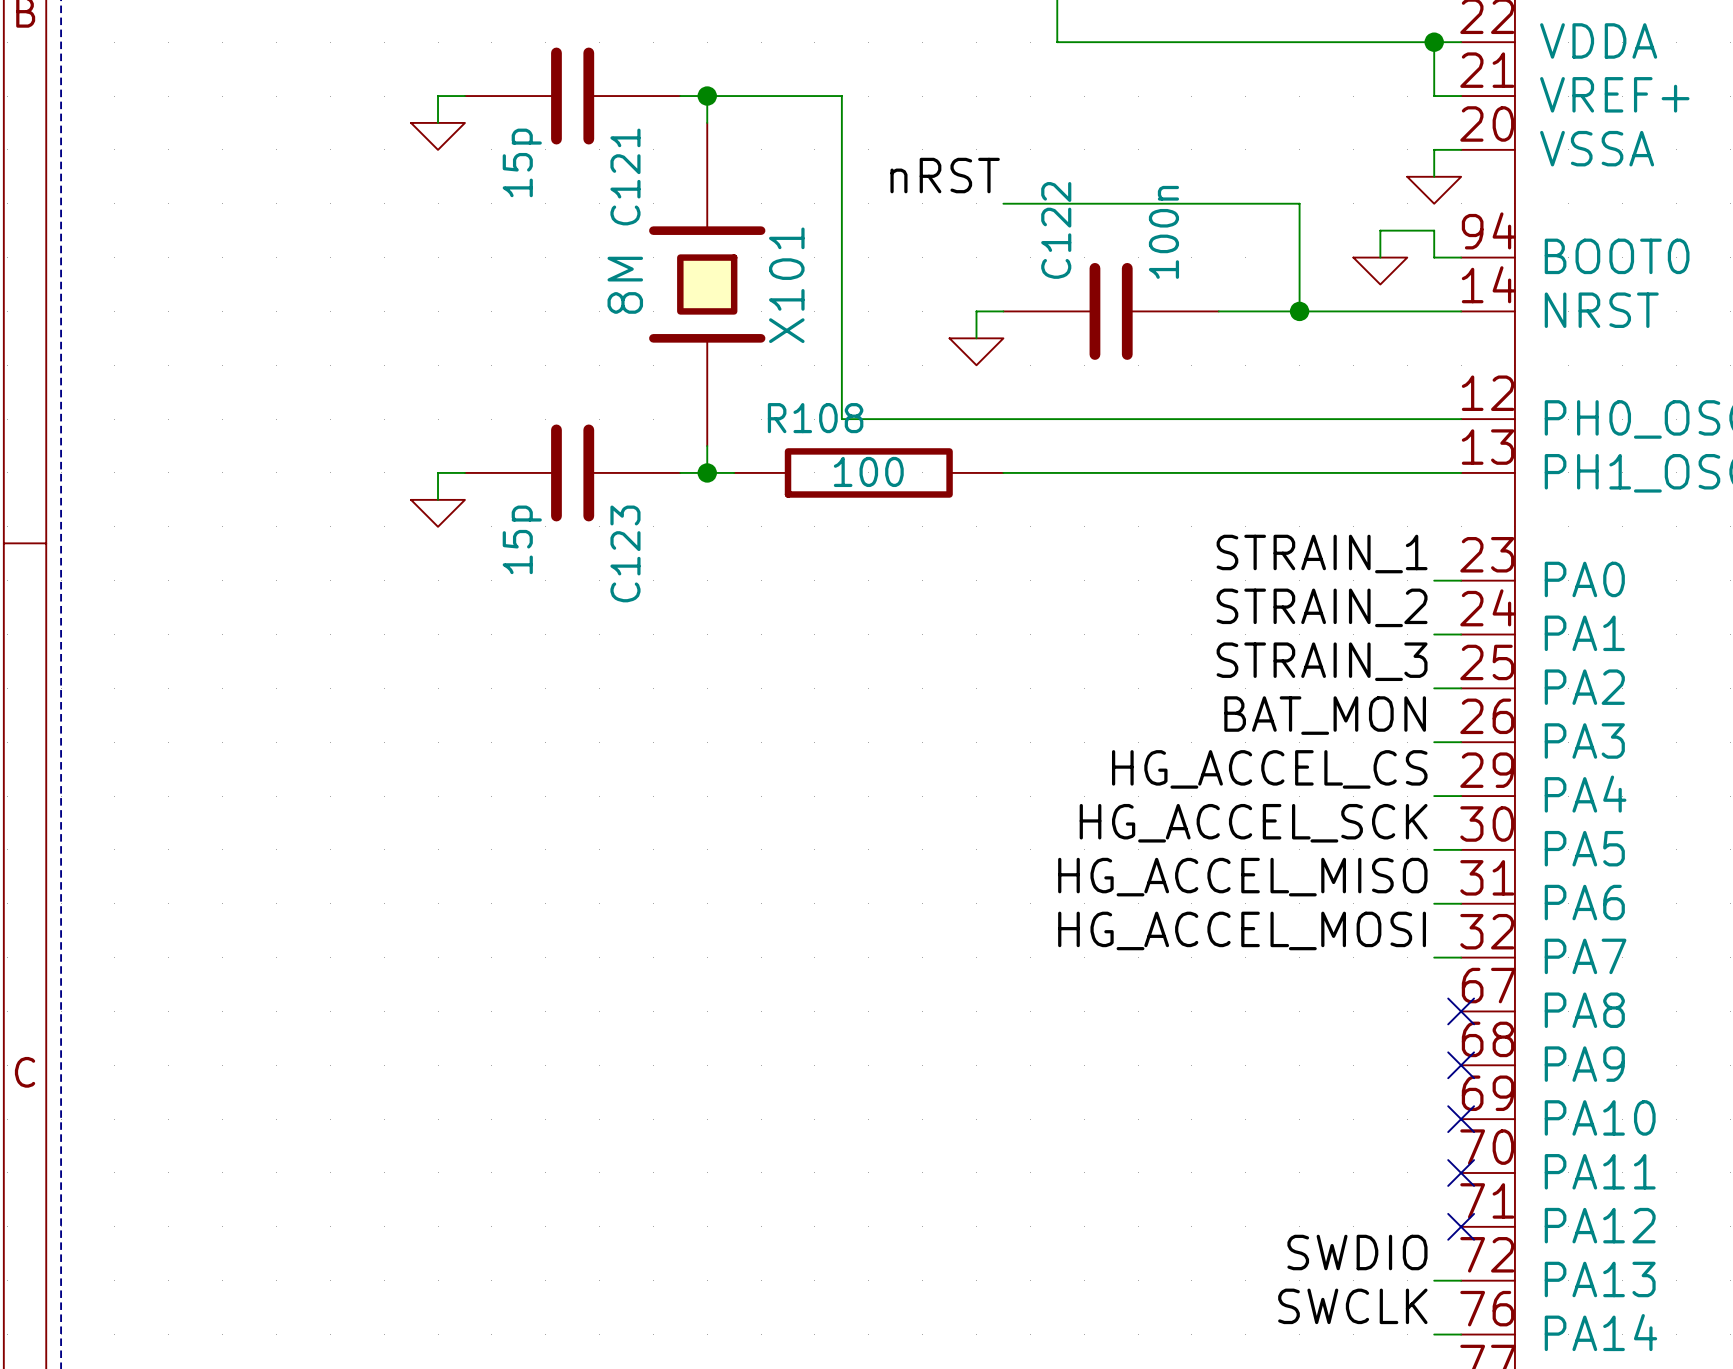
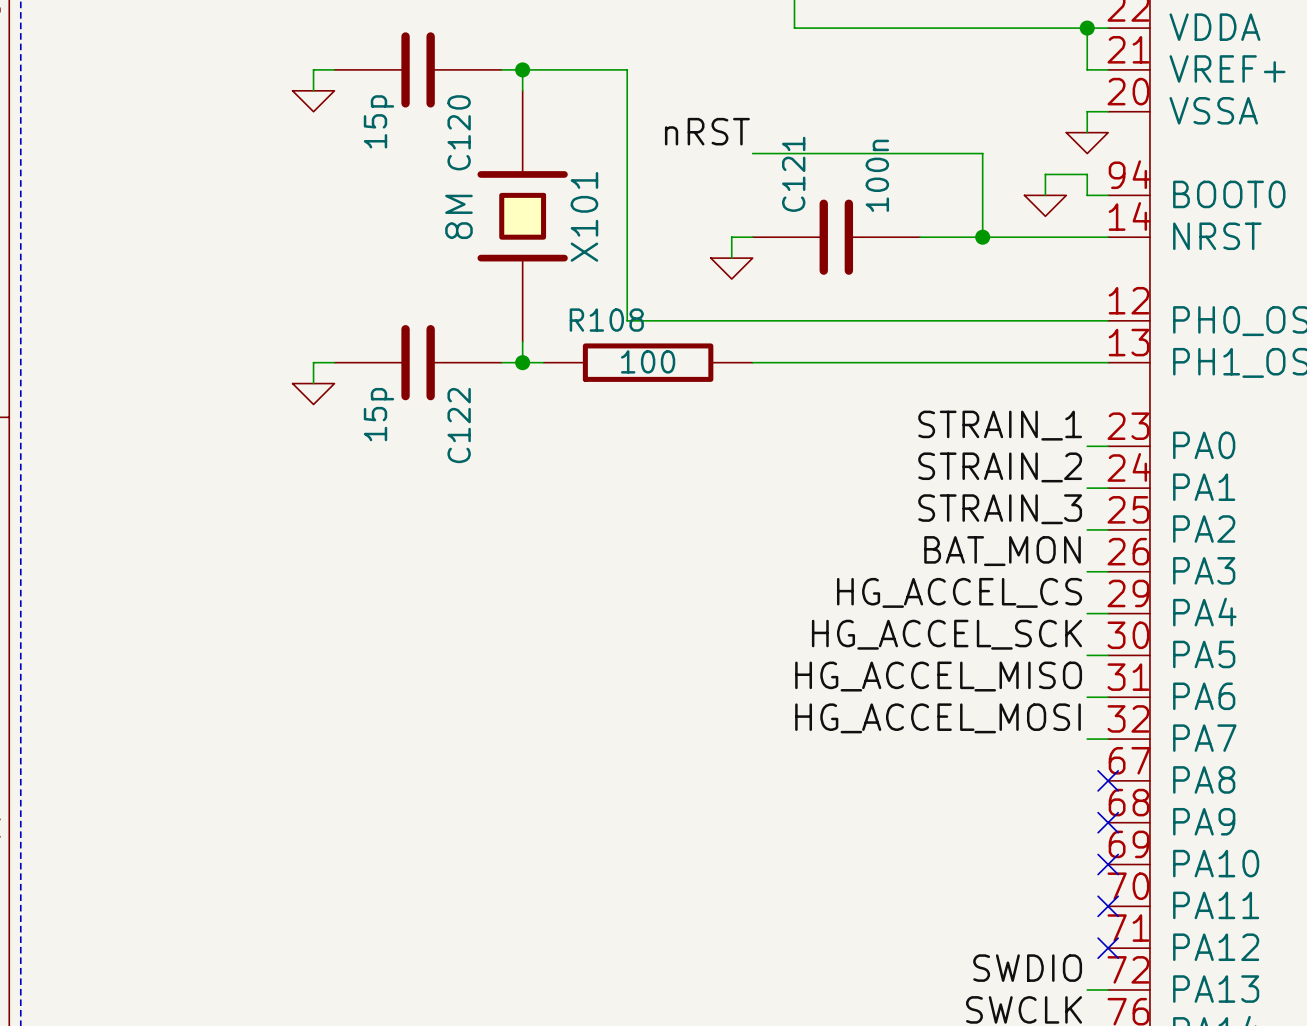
C121 name: C121 (625, 177) -> C120 (459, 132)
C122 name: C122 (1056, 230) -> C121 (793, 174)
C123 name: C123 (625, 553) -> C122 (459, 425)

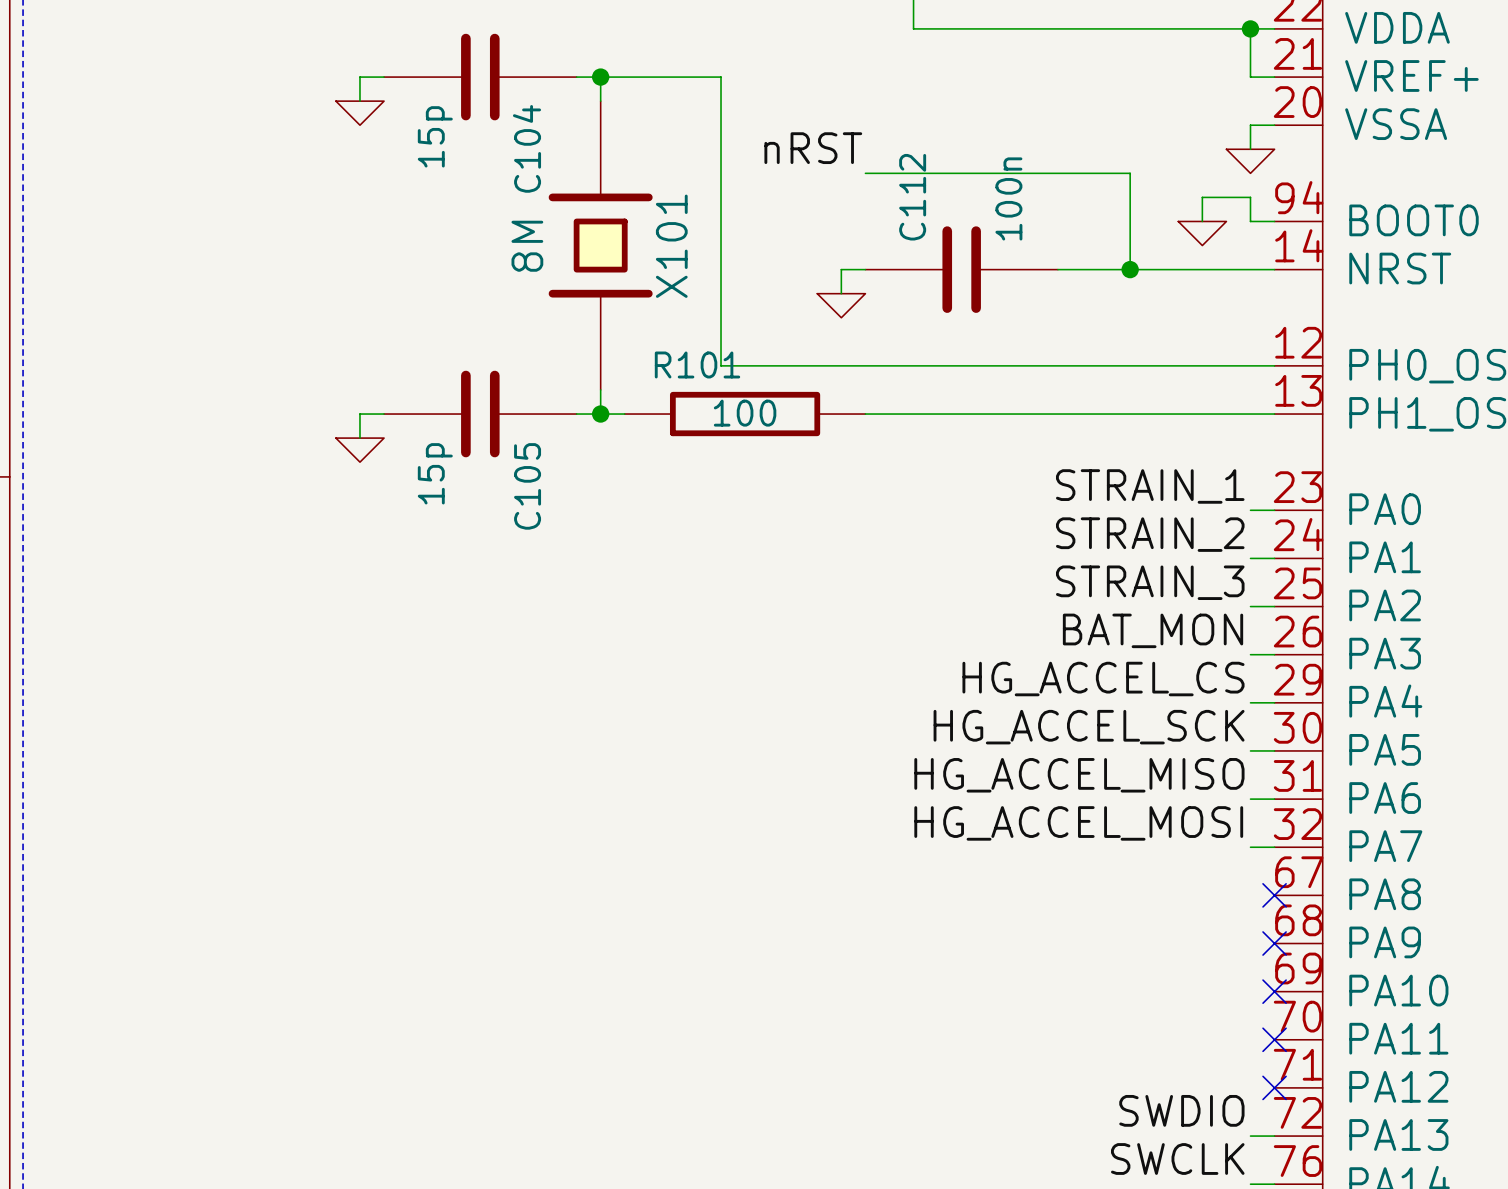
C120 name: C120 (459, 132) -> C104 (526, 148)
C121 name: C121 (793, 174) -> C112 (912, 197)
R108 name: R108 (606, 320) -> R101 (697, 364)
C122 name: C122 (459, 425) -> C105 (527, 486)

